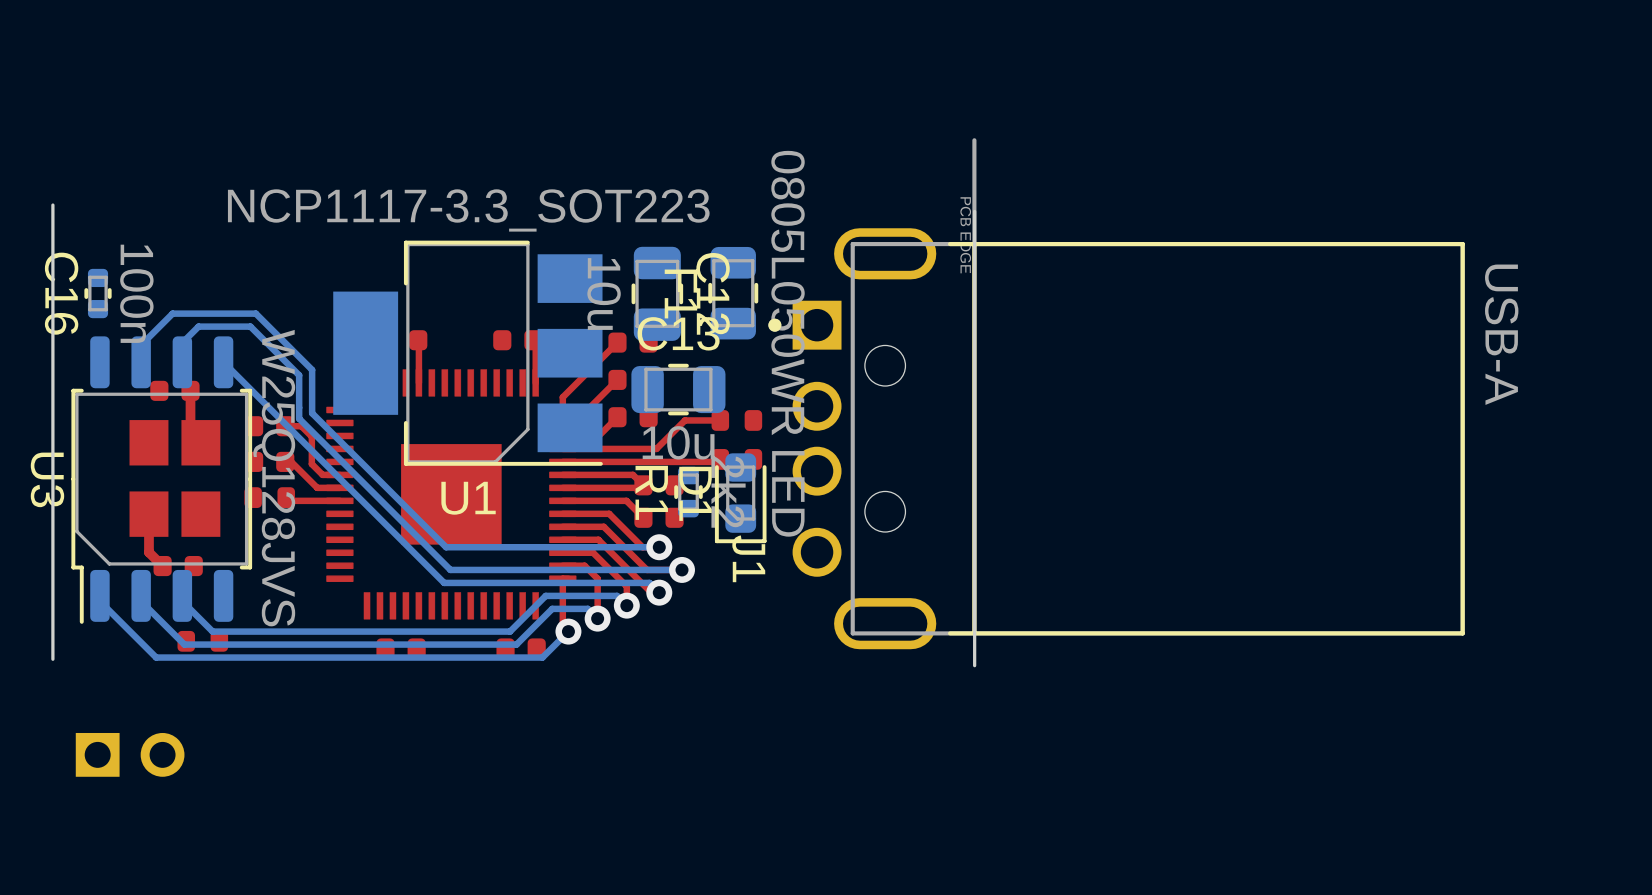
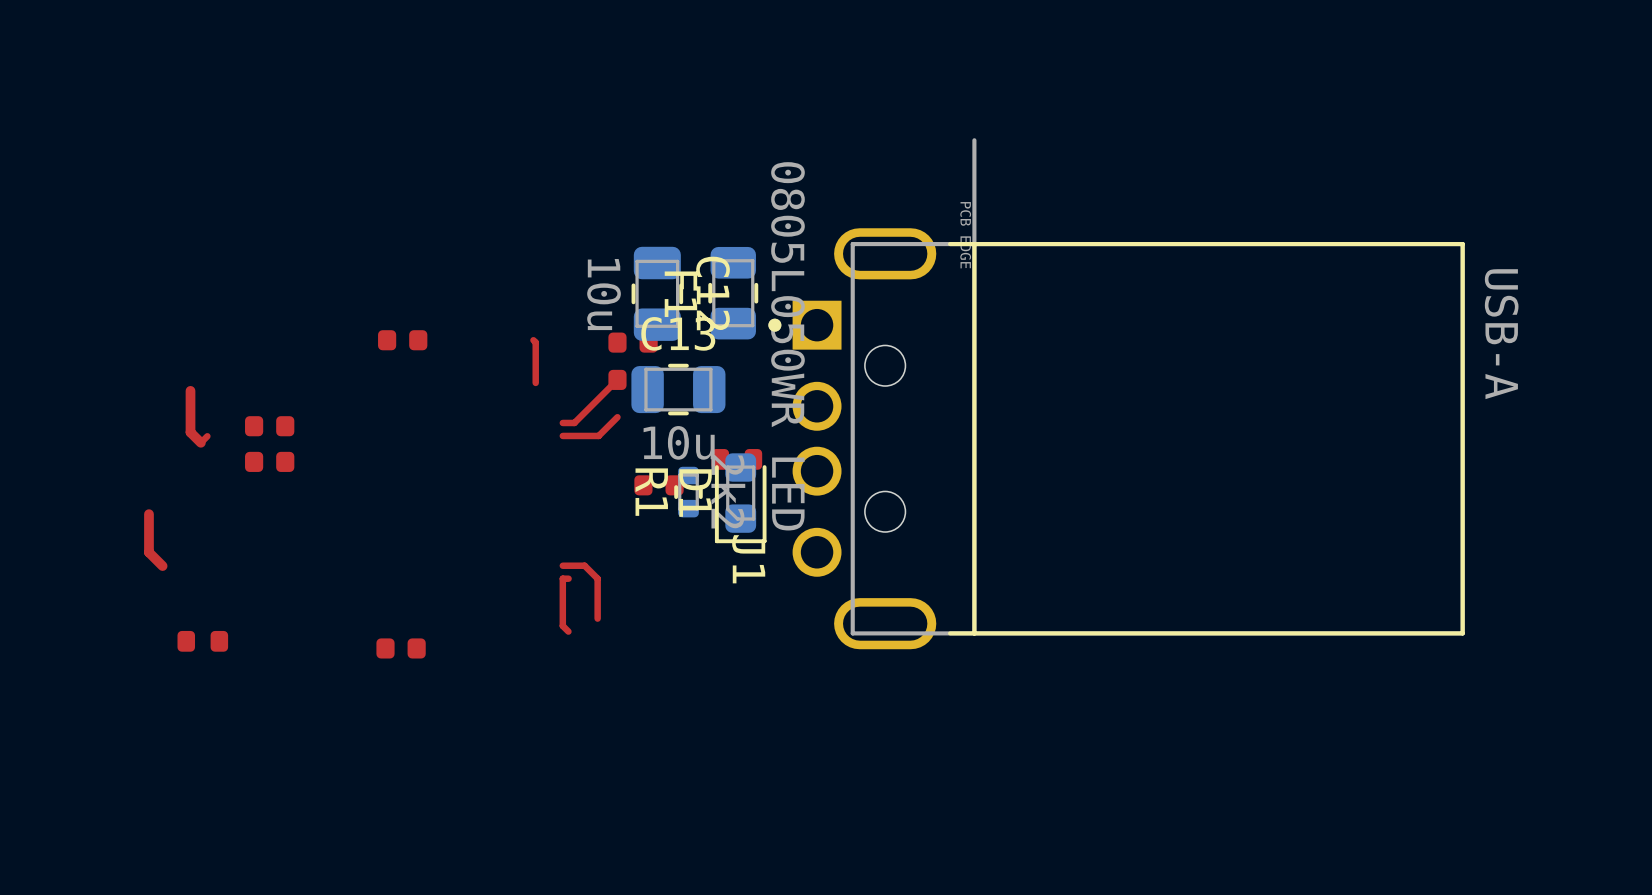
board edge: (52, 205) (52, 659) -> none
board edge: (974, 211) (974, 665) -> none
C16: 100n (98, 293) -> none
top track: (418, 340) (418, 382) -> none
part: (517, 340) -> none
top track: (617, 342) (562, 397) (562, 410) -> none
U1: NCP1117-3.3_SOT223 (468, 353) -> none
bottom track: (141, 362) (141, 345) (172, 313) (255, 313) (312, 369) (312, 413) (446, 547) (659, 547) -> none
bottom track: (182, 362) (182, 342) (198, 326) (250, 326) (299, 375) (299, 418) (450, 569) (682, 569) -> none
bottom track: (224, 362) (444, 582) (649, 582) (659, 592) -> none
part: (174, 390) -> none
part: (633, 417) -> none
top track: (720, 420) (684, 420) (656, 448) (562, 448) -> none
part: (736, 420) -> none
top track: (285, 426) (301, 426) (311, 436) (311, 464) (322, 474) (339, 474) -> none
top track: (720, 459) (717, 461) (562, 461) -> none
top track: (285, 461) (291, 461) (317, 487) (339, 487) -> none
top track: (562, 474) (632, 474) (643, 485) (640, 487) (562, 487) -> none
part: (174, 478) -> none
U3: W25Q128JVS (161, 480) -> none
part: (451, 494) -> none
part: (269, 497) -> none
top track: (286, 497) (289, 500) (339, 500) -> none
top track: (562, 500) (626, 500) (643, 517) -> none
top track: (562, 513) (609, 513) (642, 547) (659, 547) -> none
part: (659, 517) -> none
top track: (562, 526) (603, 526) (646, 569) (682, 569) -> none
top track: (562, 539) (598, 539) (651, 592) (659, 592) -> none
via: (659, 547) -> none
top track: (562, 552) (593, 552) (626, 586) (626, 605) -> none
part: (178, 566) -> none
via: (682, 569) -> none
via: (659, 592) -> none
bottom track: (99, 595) (99, 601) (156, 657) (542, 657) (568, 631) -> none
bottom track: (141, 595) (141, 601) (184, 644) (516, 644) (552, 608) (587, 608) (597, 618) -> none
bottom track: (182, 601) (212, 631) (510, 631) (545, 595) (617, 595) (626, 605) -> none
via: (626, 605) -> none
via: (597, 618) -> none
via: (568, 631) -> none
part: (521, 648) -> none
part: (130, 754) -> none

